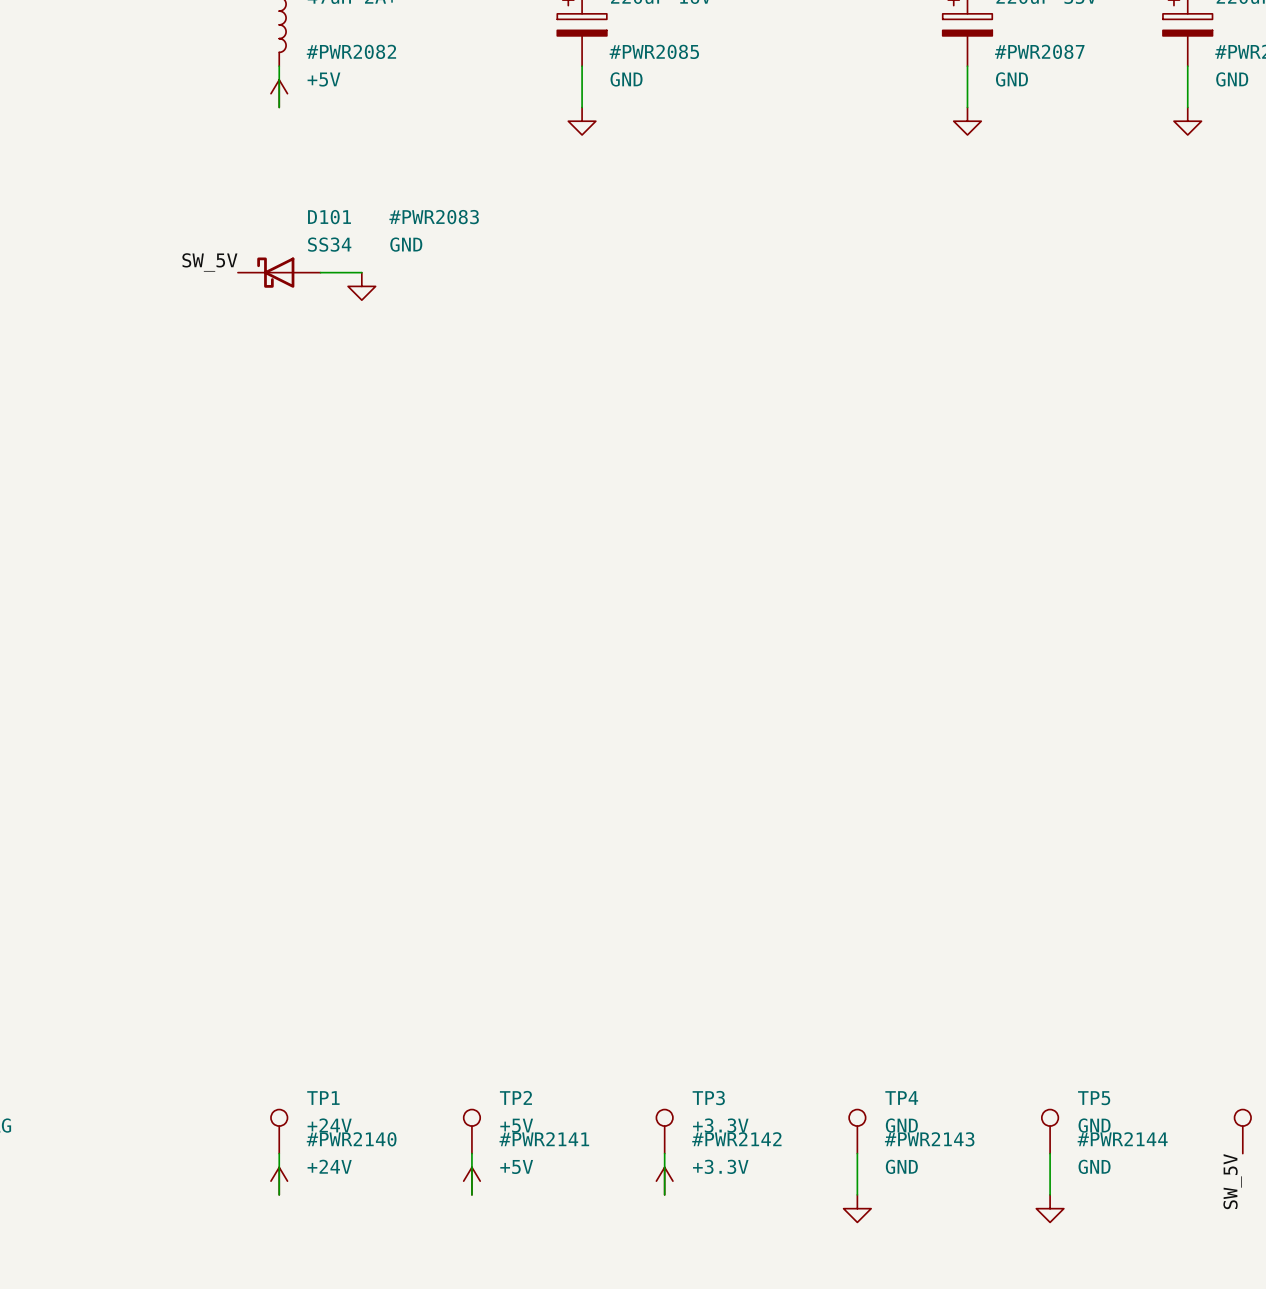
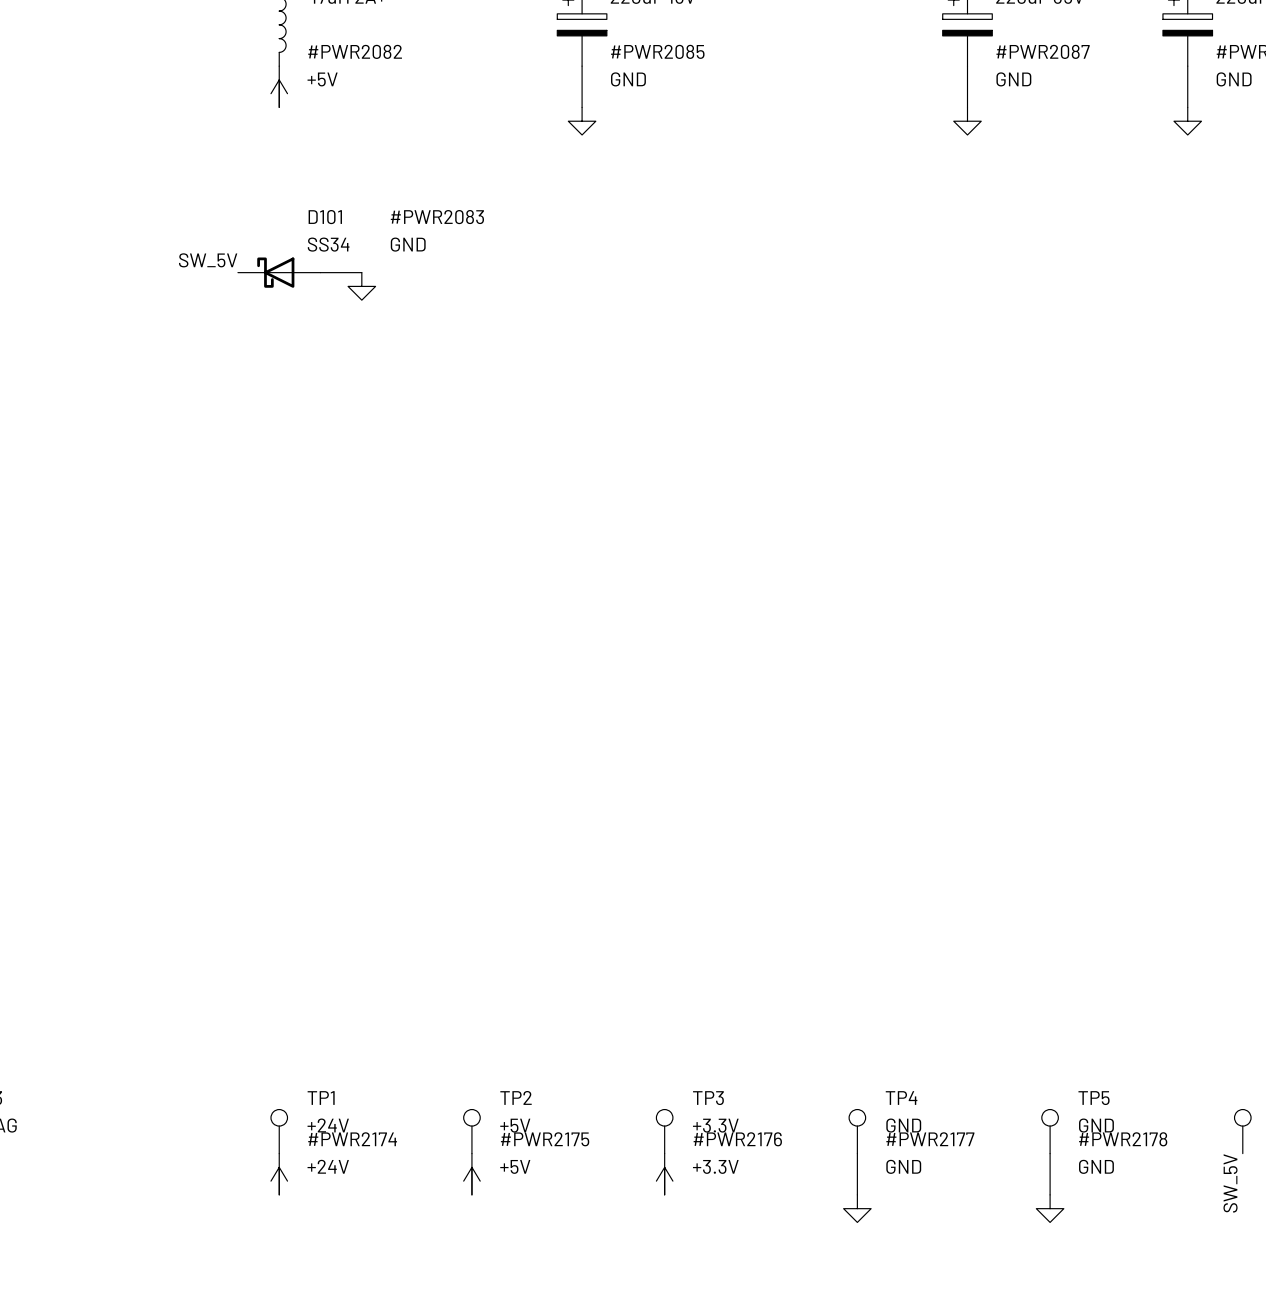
#PWR2140 name: #PWR2140 (351, 1139) -> #PWR2174 (352, 1139)
#PWR2141 name: #PWR2141 (544, 1139) -> #PWR2175 (545, 1139)
#PWR2142 name: #PWR2142 (736, 1139) -> #PWR2176 (737, 1139)
#PWR2143 name: #PWR2143 (929, 1139) -> #PWR2177 (930, 1139)
#PWR2144 name: #PWR2144 (1122, 1139) -> #PWR2178 (1123, 1139)

